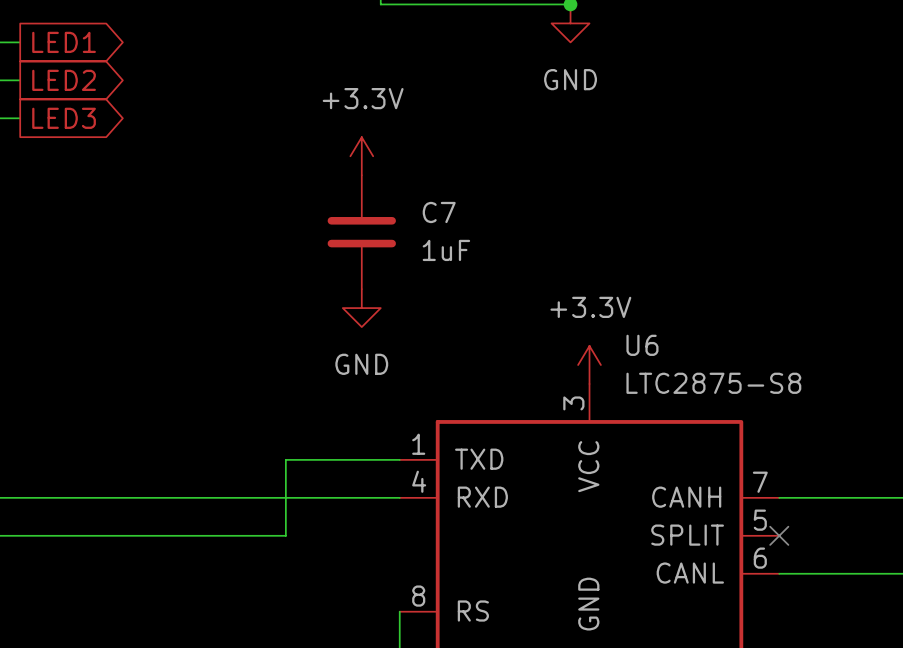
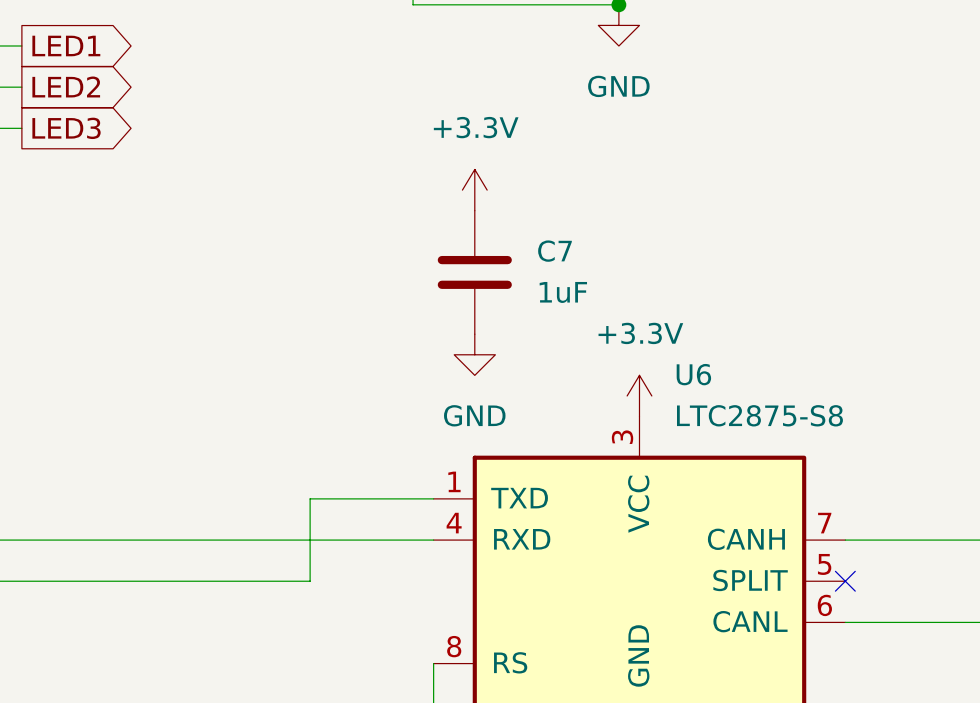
power symbol position: +3.3V (361, 156) -> +3.3V (474, 190)
C7 position: (361, 232) -> (474, 272)
power symbol position: GND (361, 308) -> GND (474, 354)

